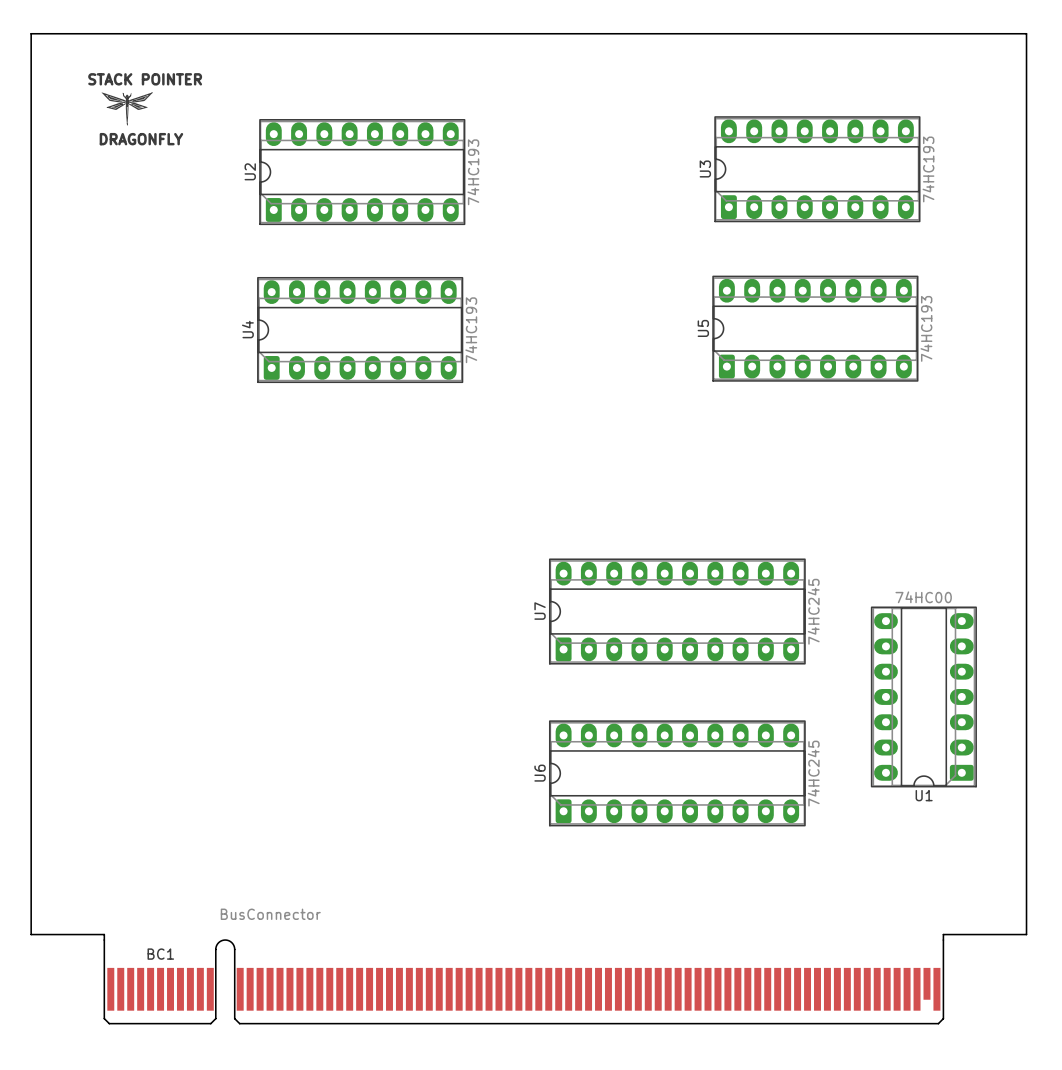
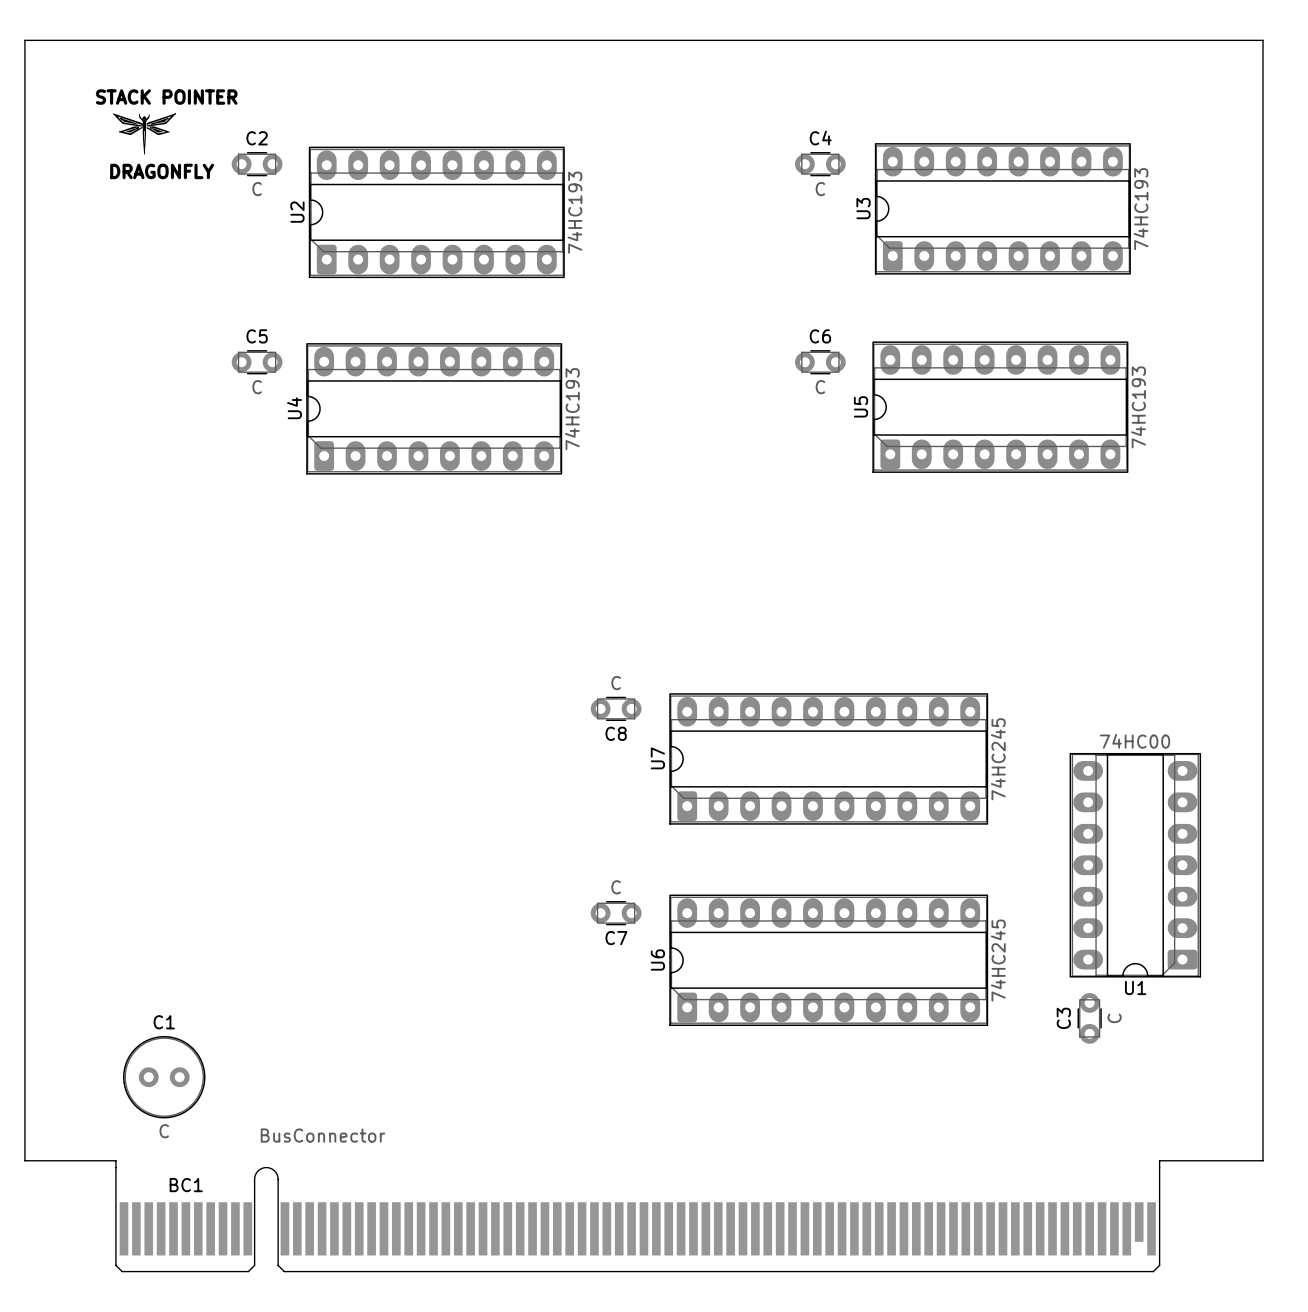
C2: none -> C (257, 164)
C4: none -> C (820, 164)
C5: none -> C (257, 362)
C6: none -> C (820, 362)
C8: none -> C (616, 708)
C7: none -> C (616, 913)
C3: none -> C (1089, 1018)
C1: none -> C (164, 1077)

